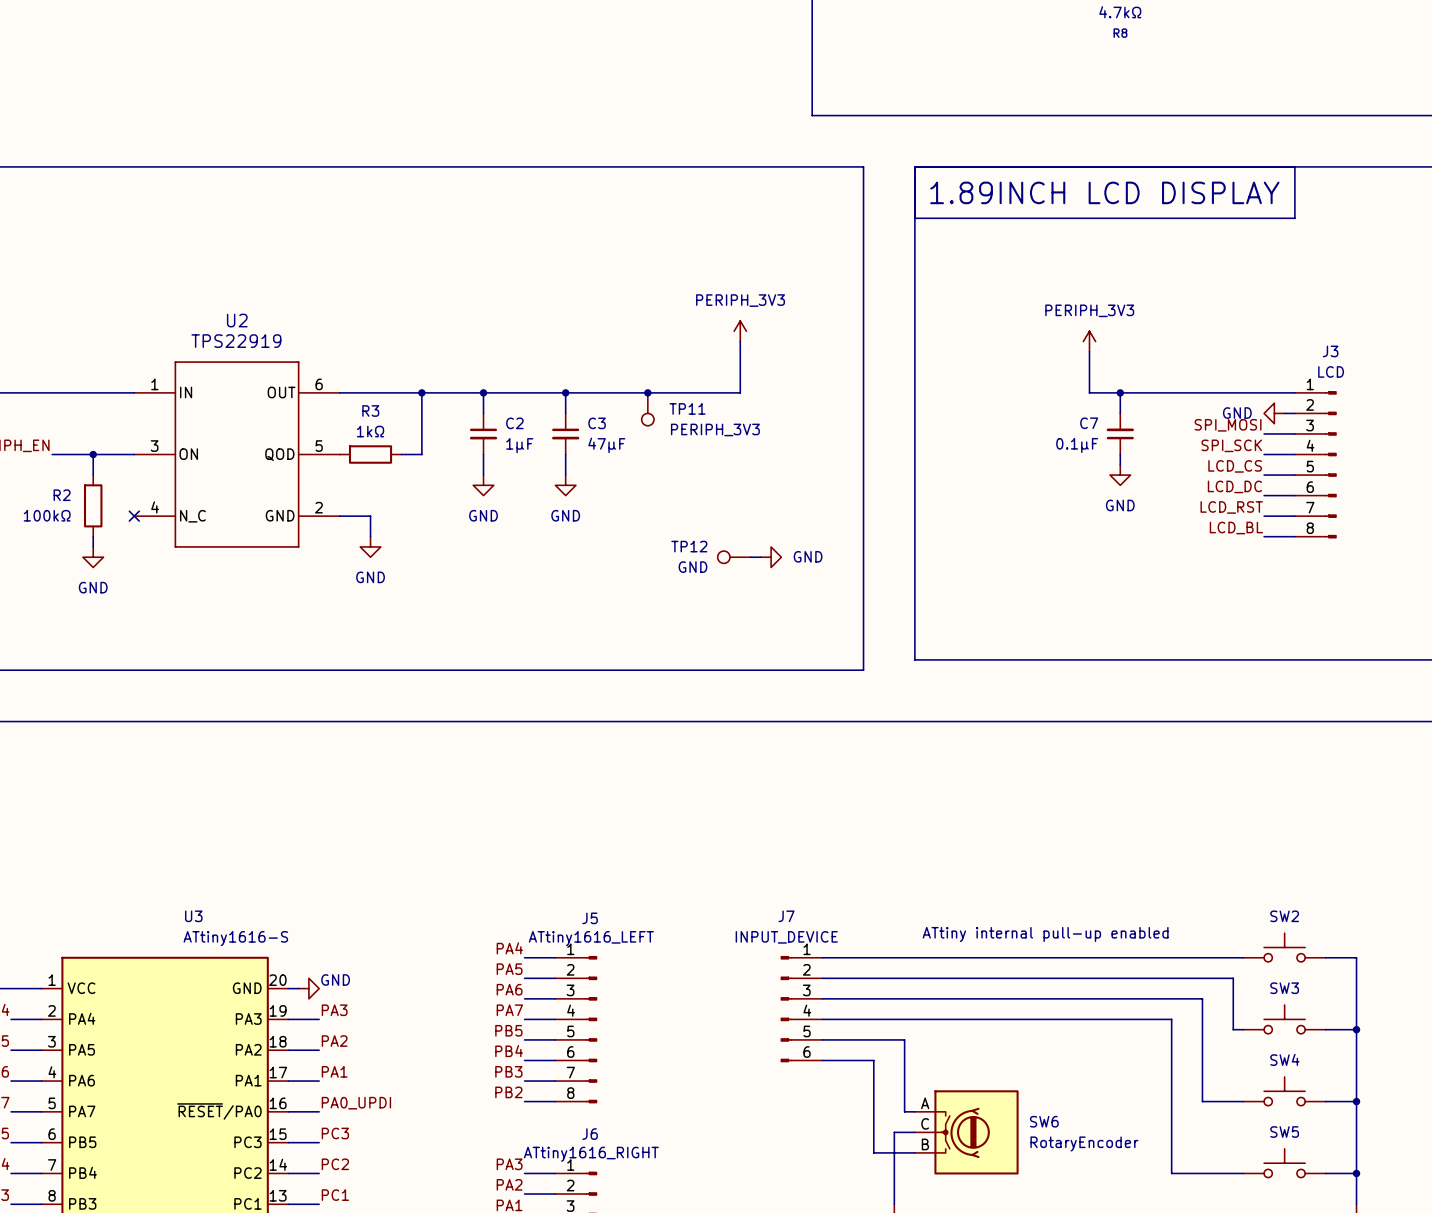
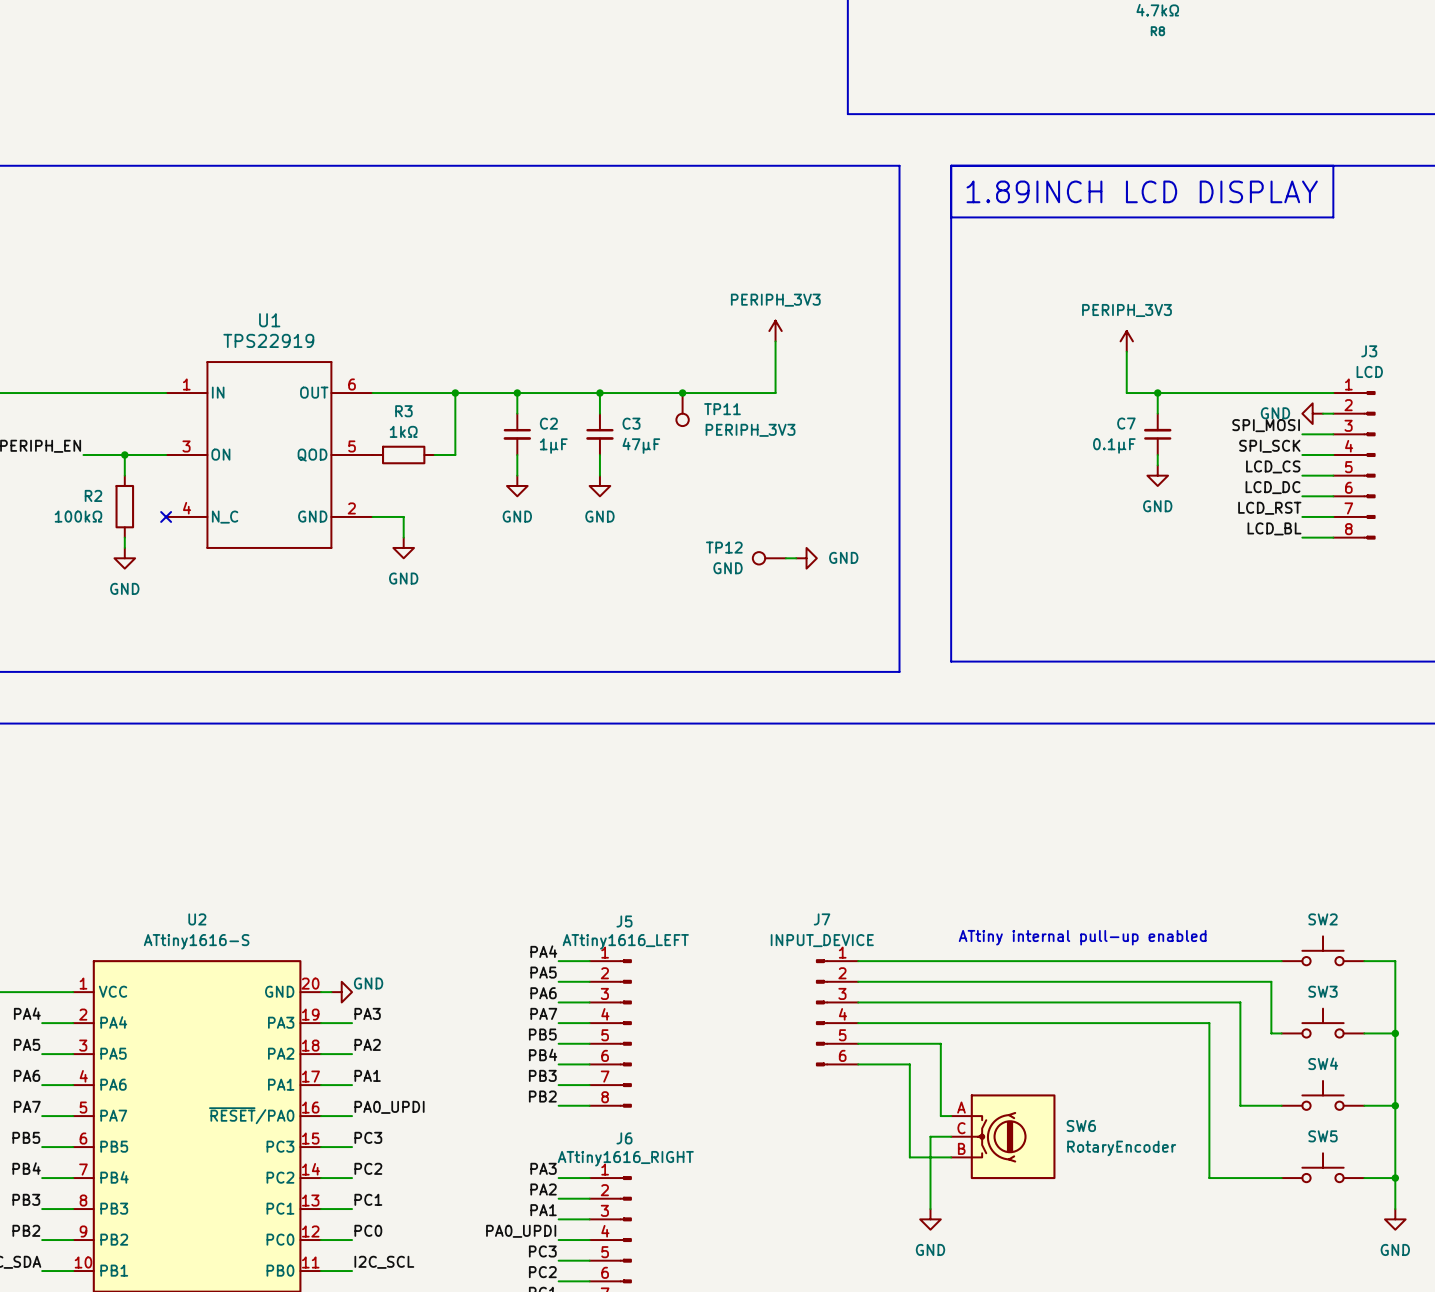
U2 name: U2 (237, 320) -> U1 (269, 320)
U3 name: U3 (193, 916) -> U2 (197, 919)
U3 value position: ATtiny1616-S (235, 938) -> ATtiny1616-S (196, 941)

